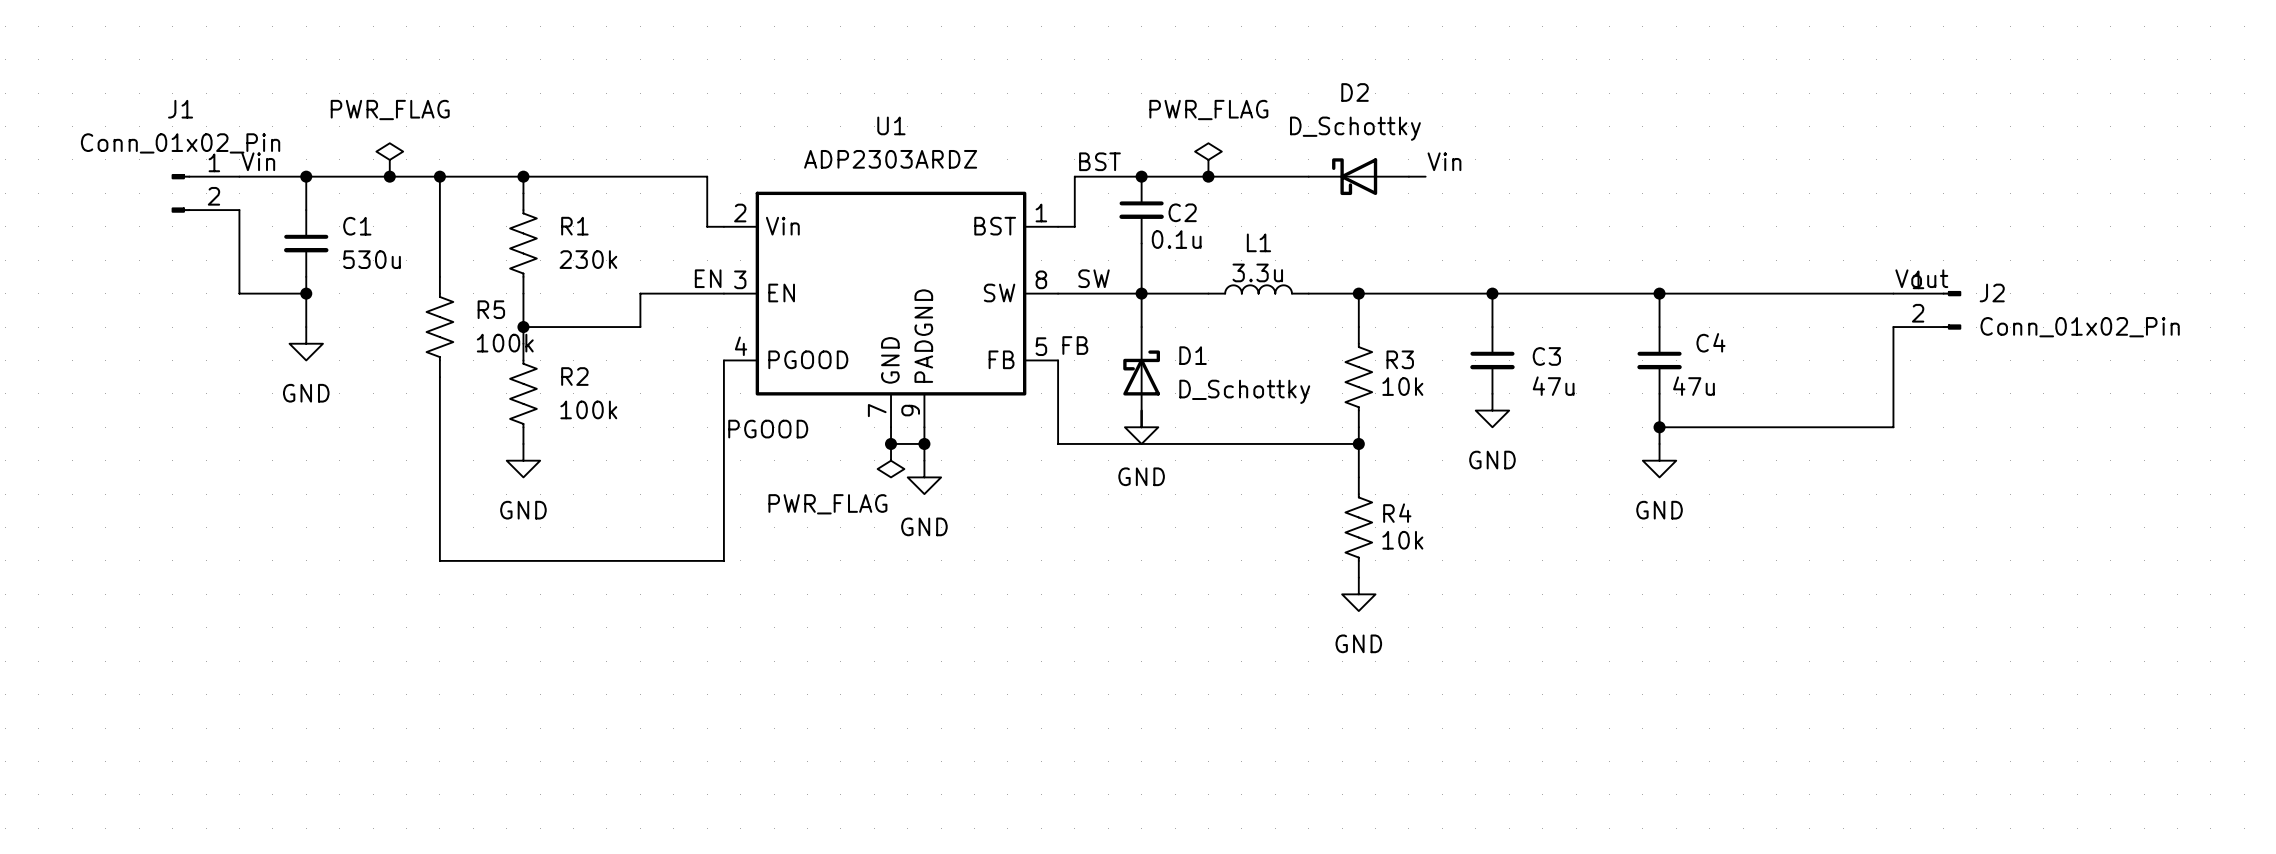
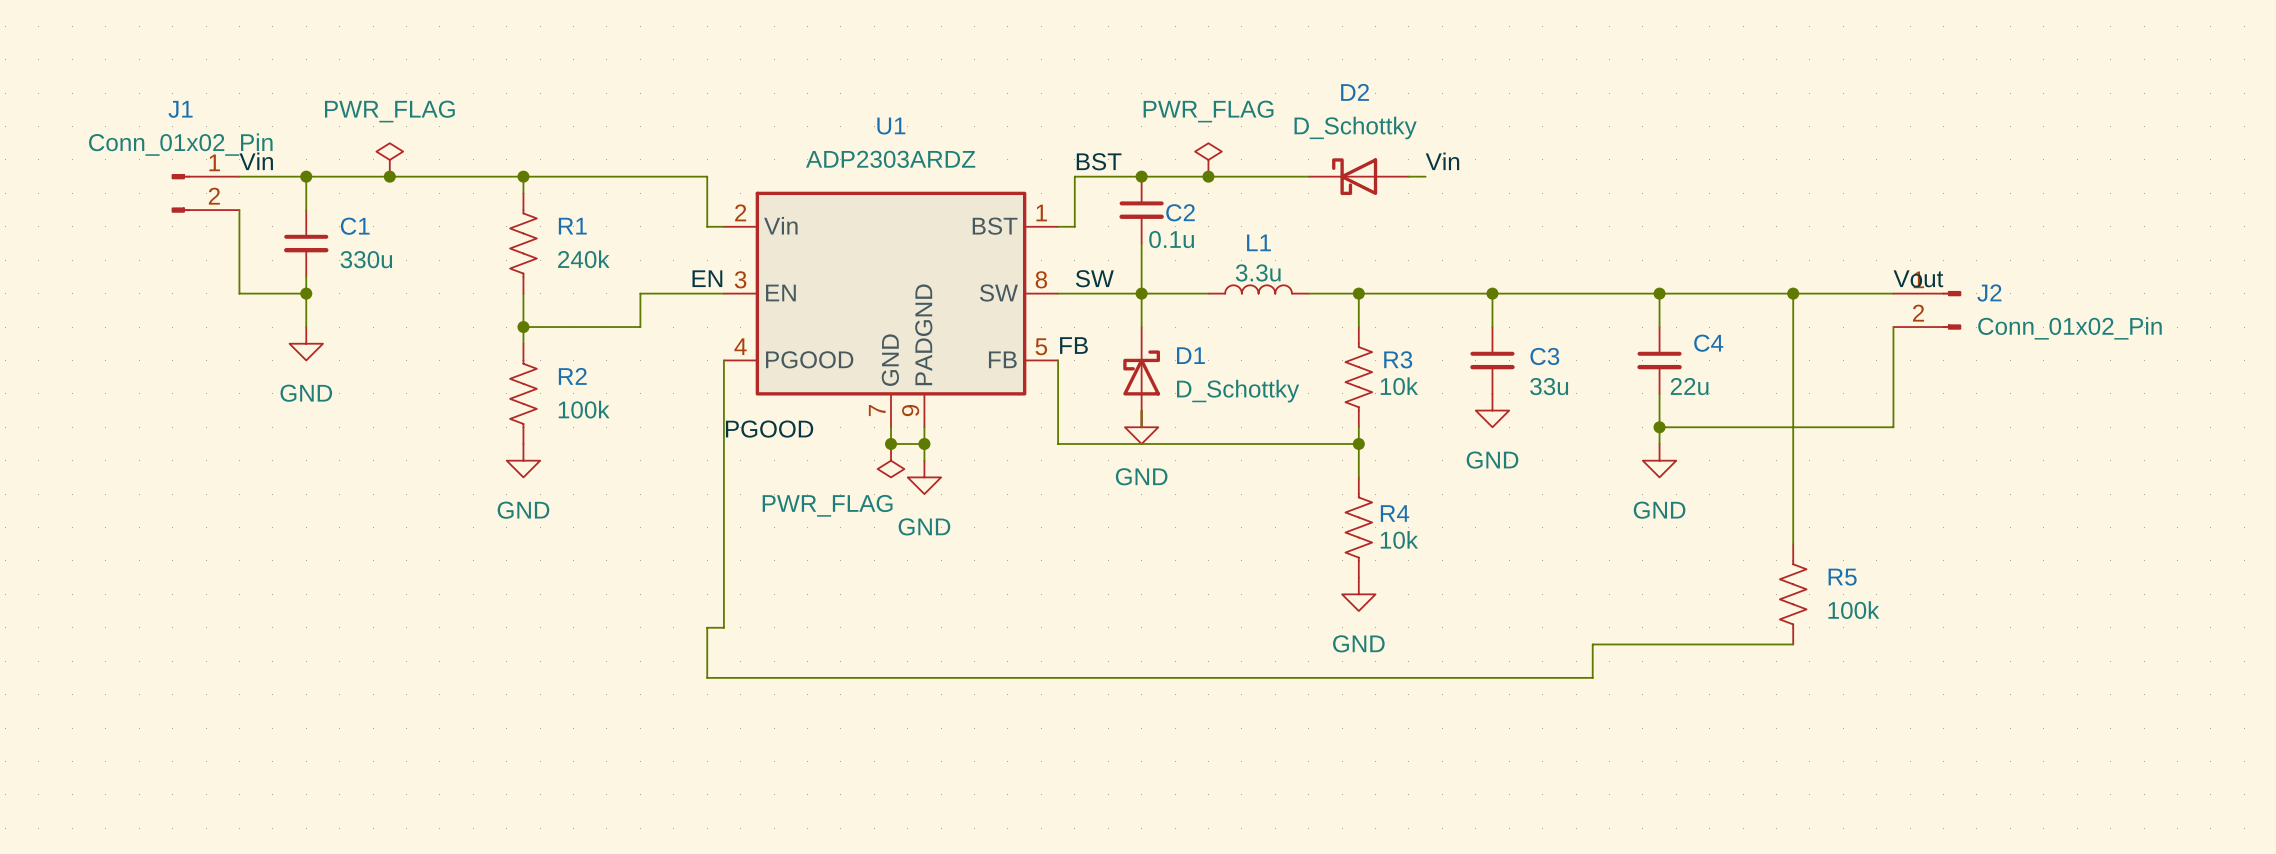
wire: (439, 176) (439, 276) -> none
junction: (439, 176) -> none
C1 value: 530u (372, 259) -> 330u (366, 259)
R1 value: 230k (588, 259) -> 240k (583, 259)
wire: none -> (1793, 293) (1793, 544)
junction: none -> (1793, 293)
R5 position: (439, 327) -> (1793, 594)
wire: (439, 377) (439, 560) (723, 560) -> (1793, 644) (1592, 644) (1592, 677) (707, 677) (707, 627) (723, 627) (723, 560)
C3 value: 47u (1553, 386) -> 33u (1549, 386)
C4 value: 47u (1693, 386) -> 22u (1689, 386)

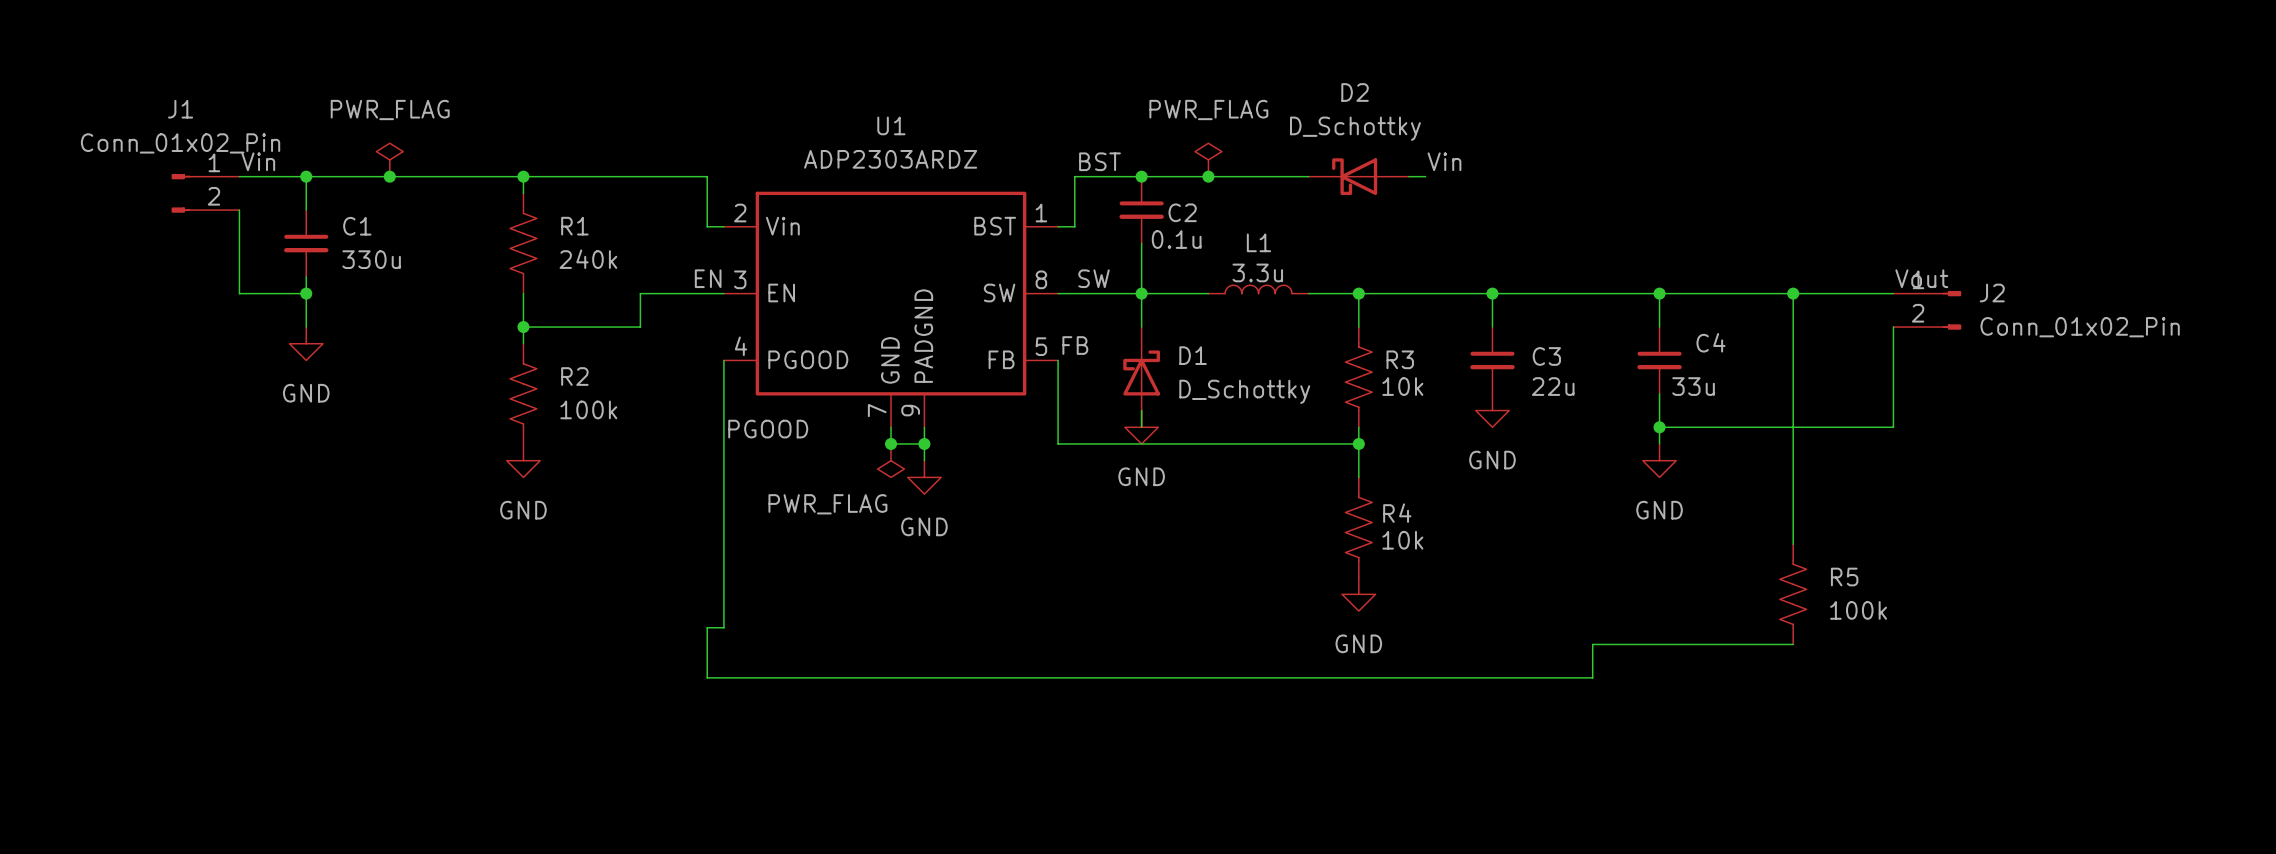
C3 value: 33u (1549, 386) -> 22u (1553, 386)
C4 value: 22u (1689, 386) -> 33u (1693, 386)

